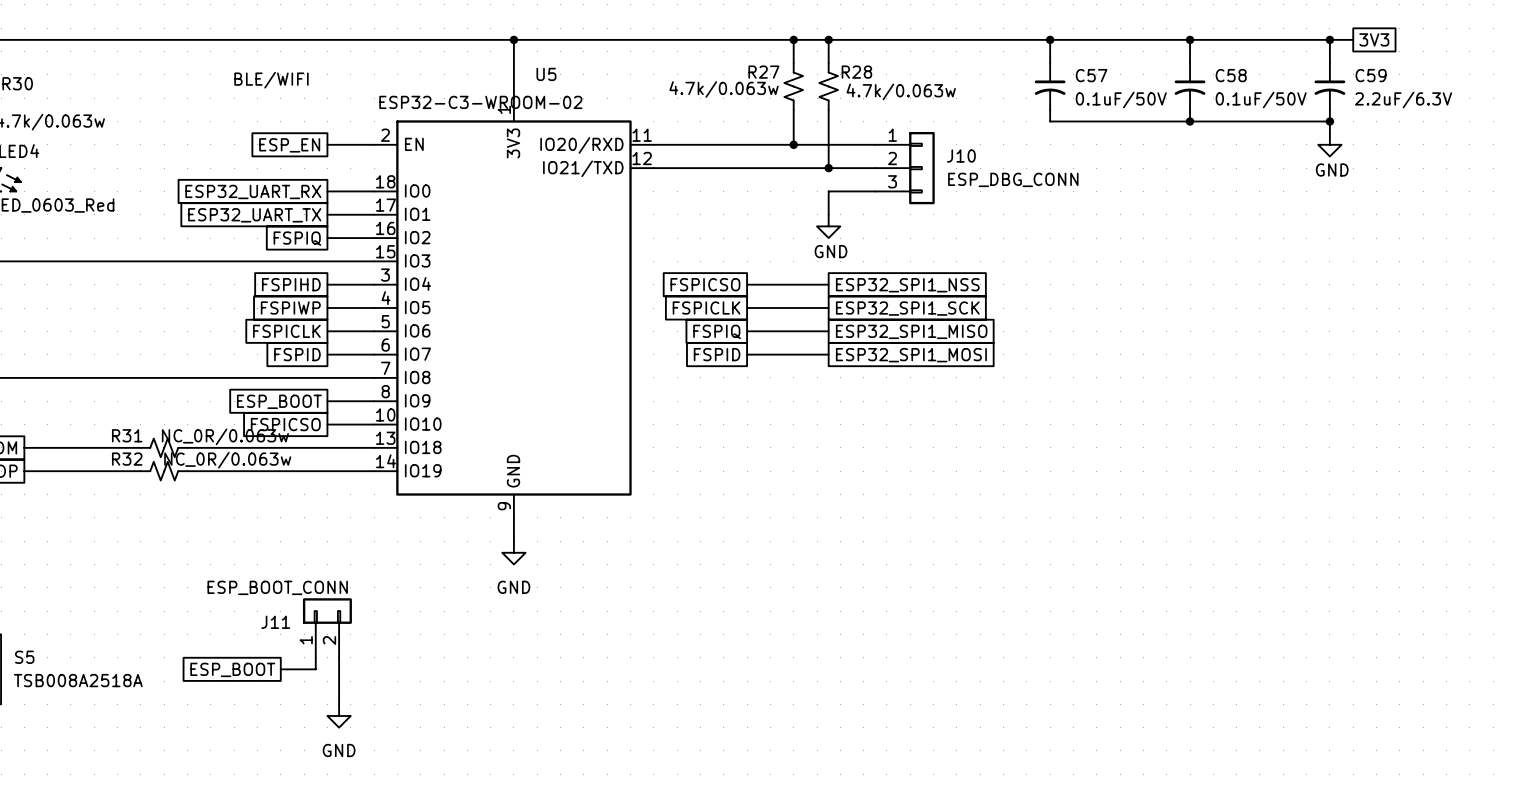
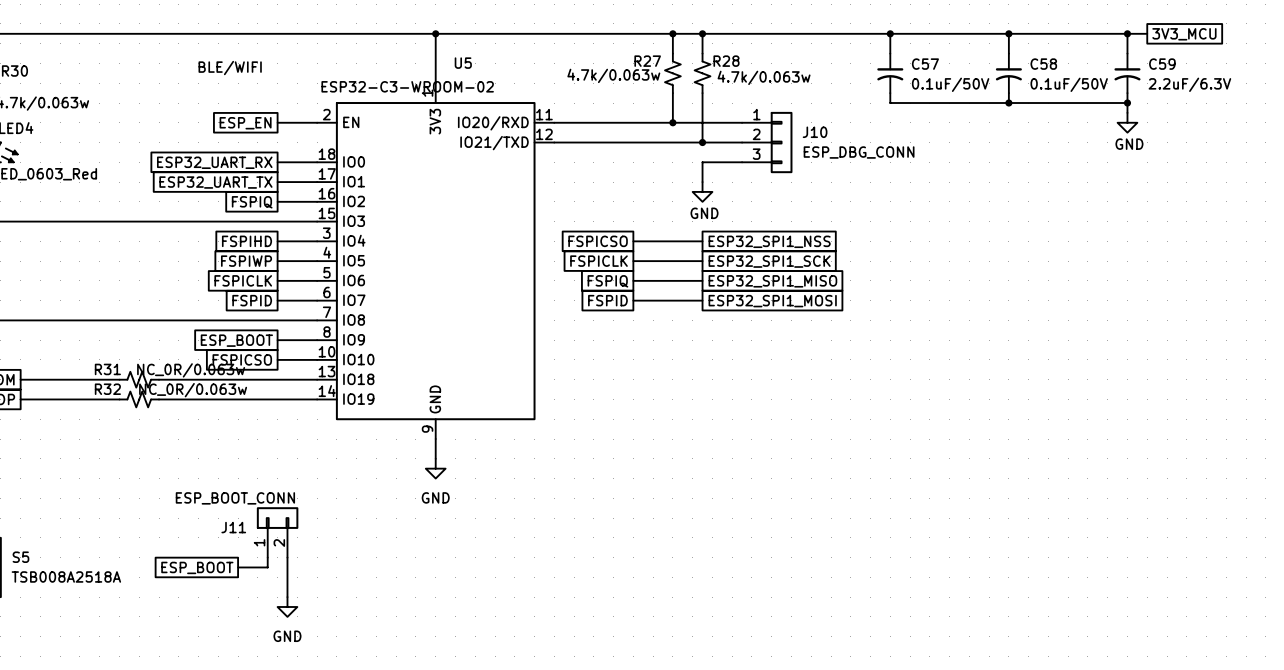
global label: 3V3 (1374, 39) -> 3V3_MCU (1184, 34)

